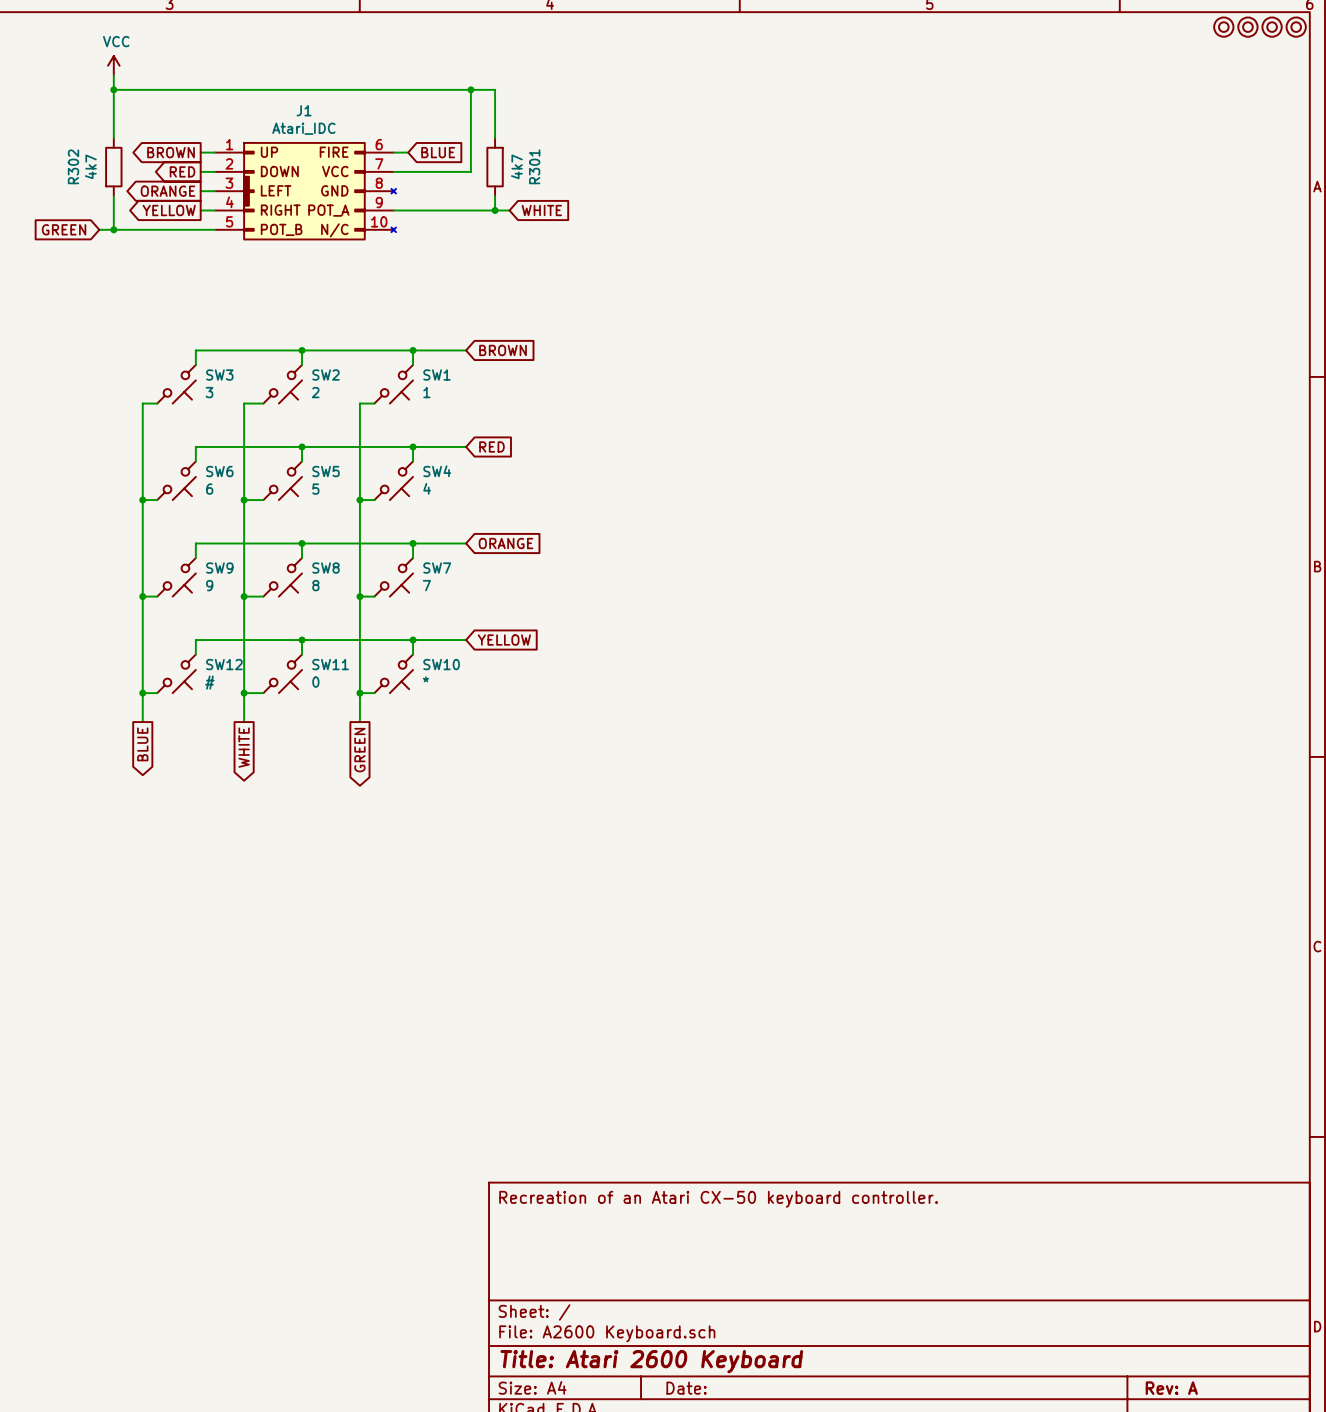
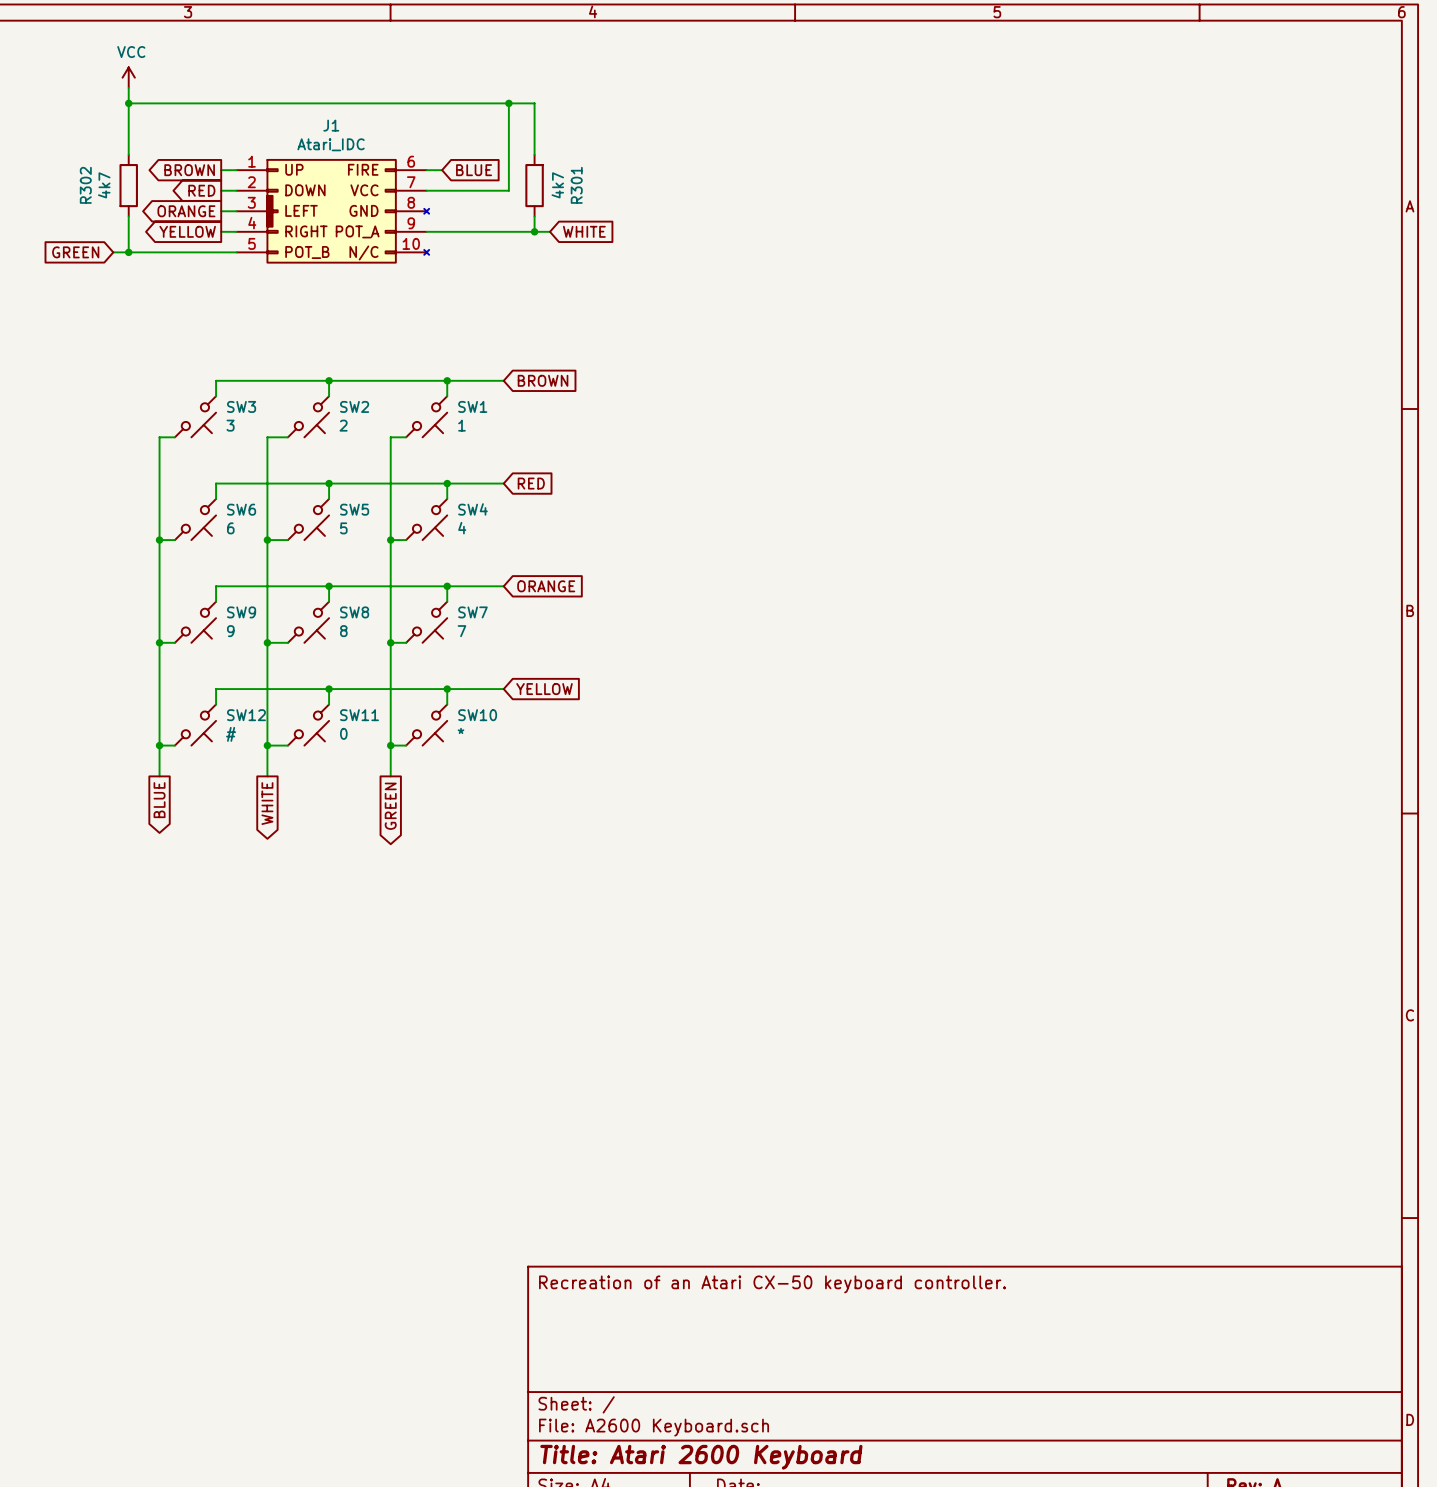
part: (1223, 27) -> none
part: (1247, 27) -> none
part: (1272, 27) -> none
part: (1296, 27) -> none

